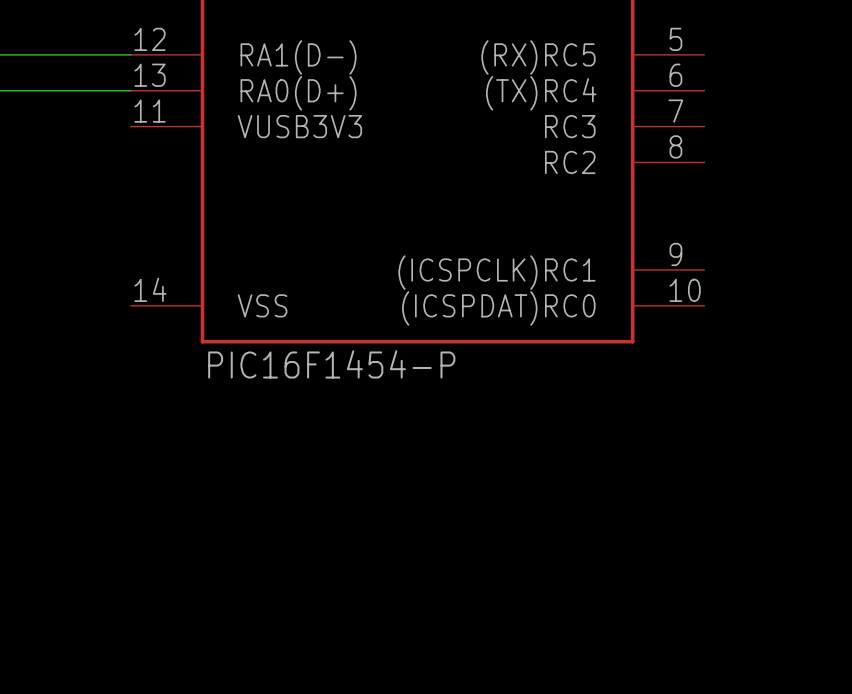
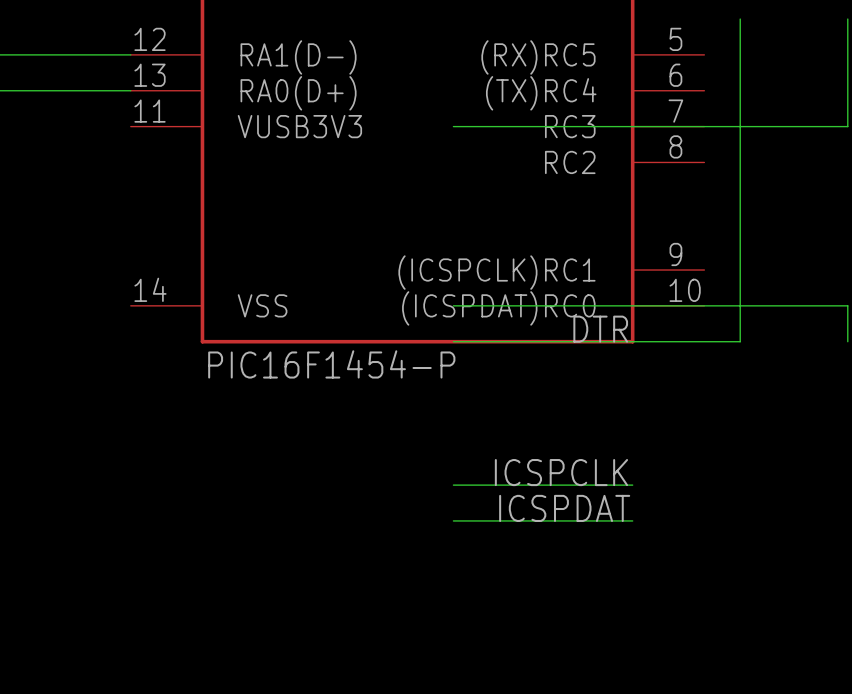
wire: none -> (740, 19) (740, 341) (453, 341)
wire: none -> (847, 19) (847, 126) (453, 126)
wire: none -> (453, 305) (847, 305) (847, 341)
label: none -> DTR (600, 329)
label: none -> ICSPCLK (561, 472)
wire: none -> (453, 485) (632, 485)
label: none -> ICSPDAT (564, 508)
wire: none -> (453, 520) (632, 520)

